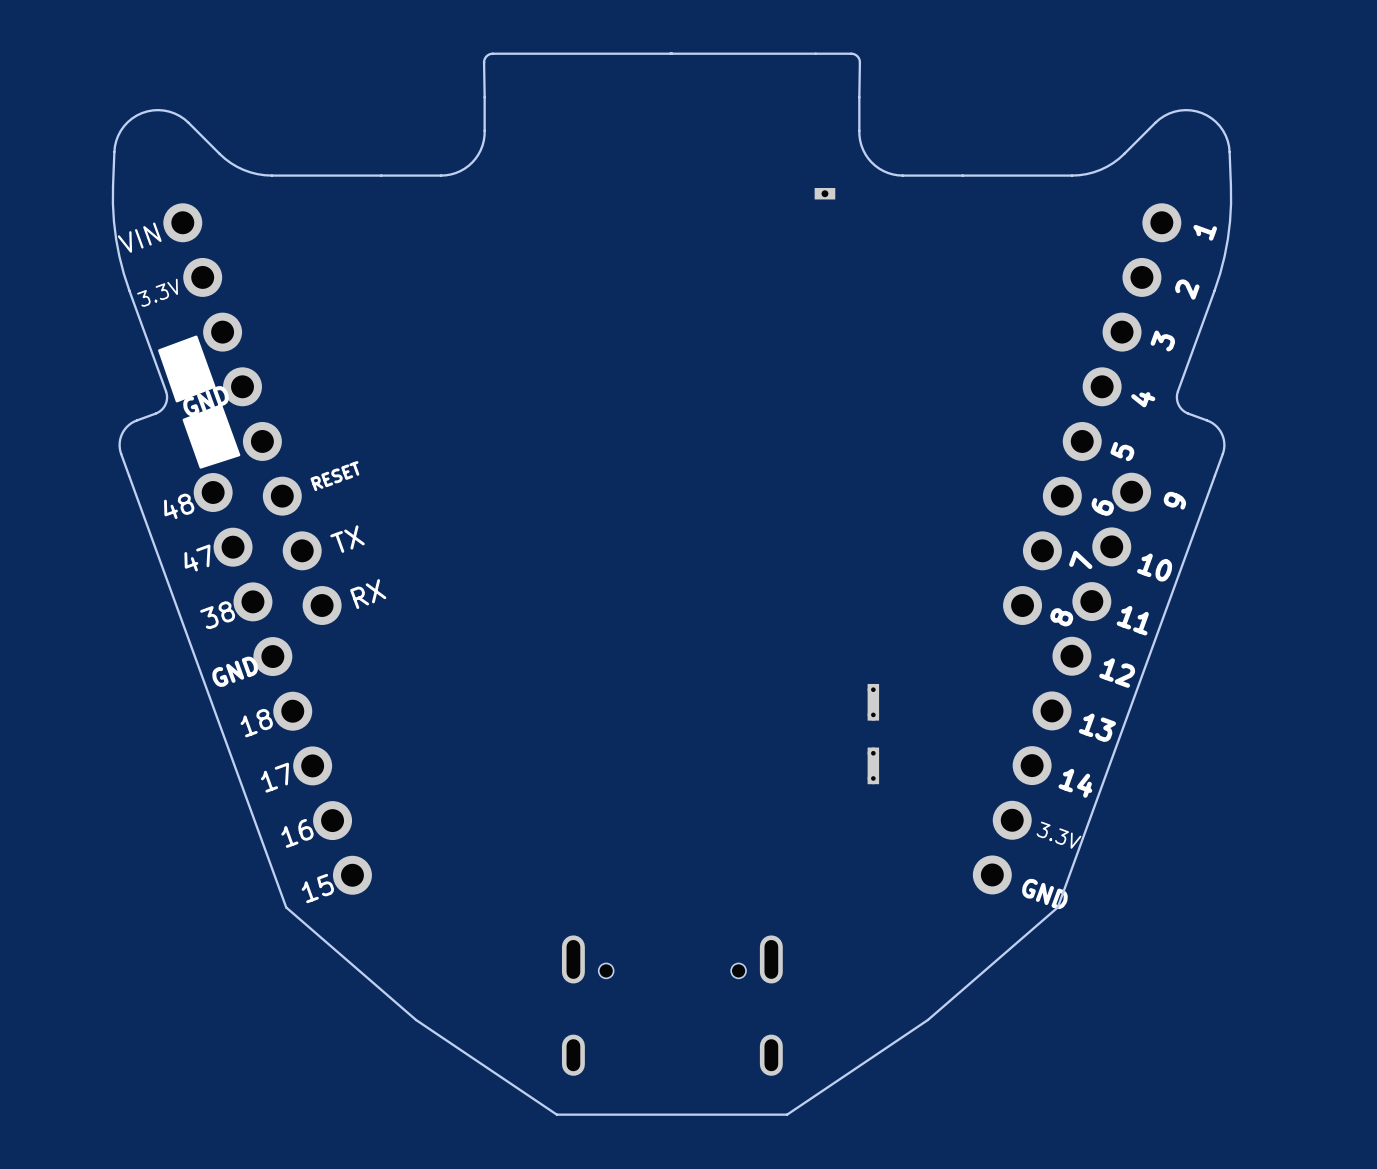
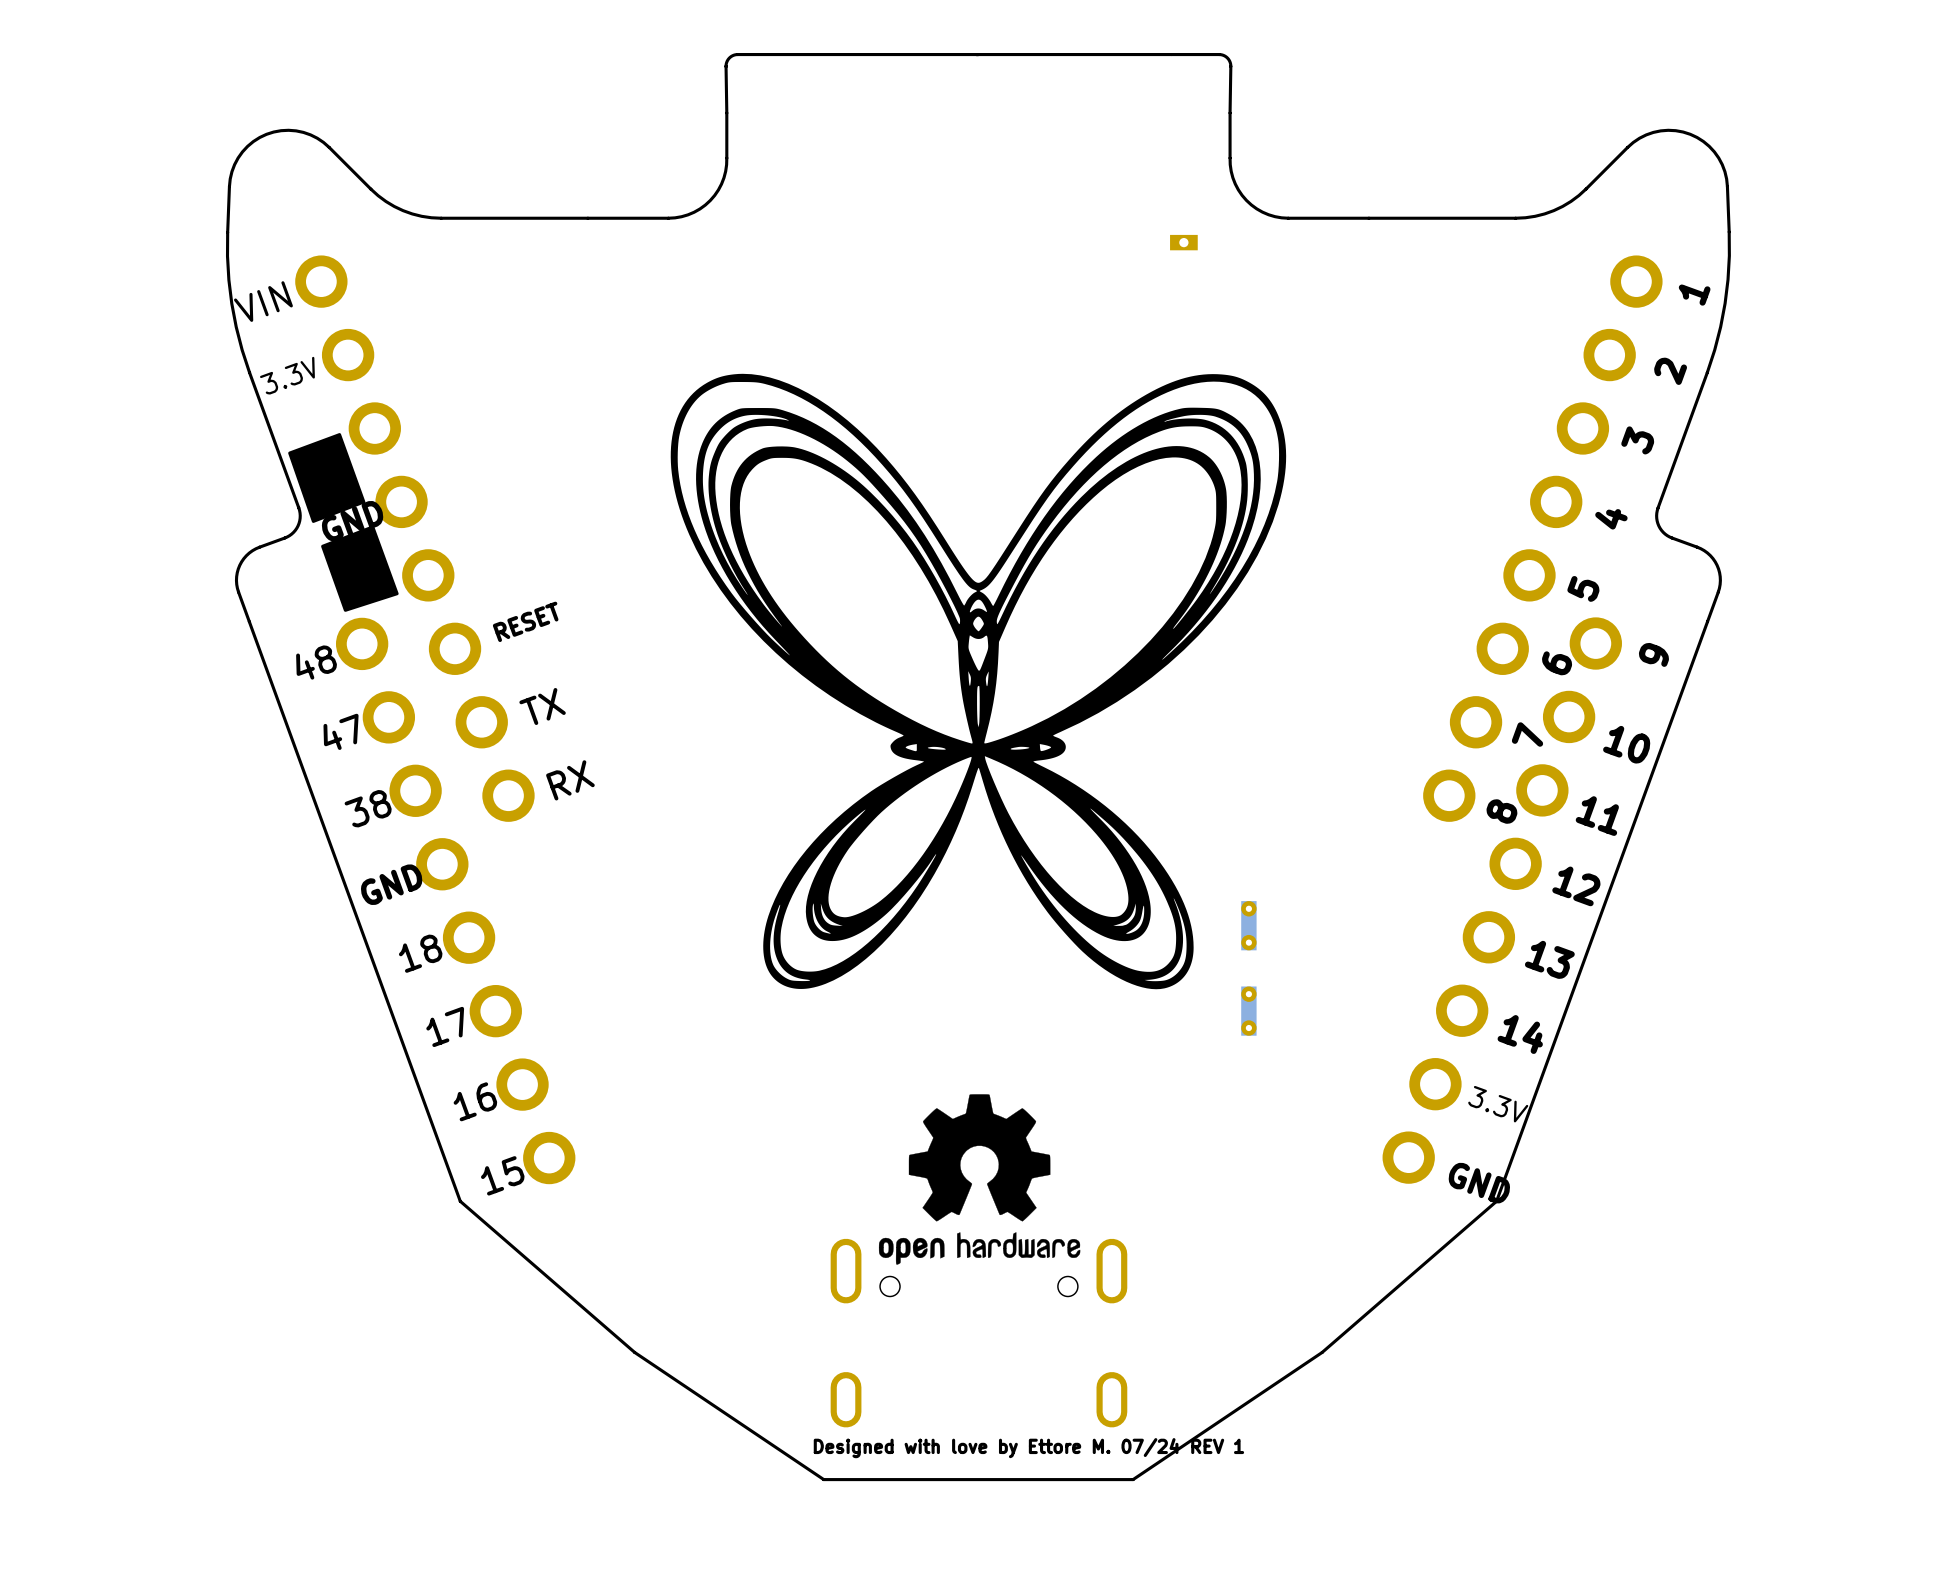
drawing: none -> [670, 373, 1287, 990]
drawing: none -> [878, 1094, 1081, 1265]
text: none -> Designed with love by Ettore M. 07/24 REV 1 (1028, 1448)

